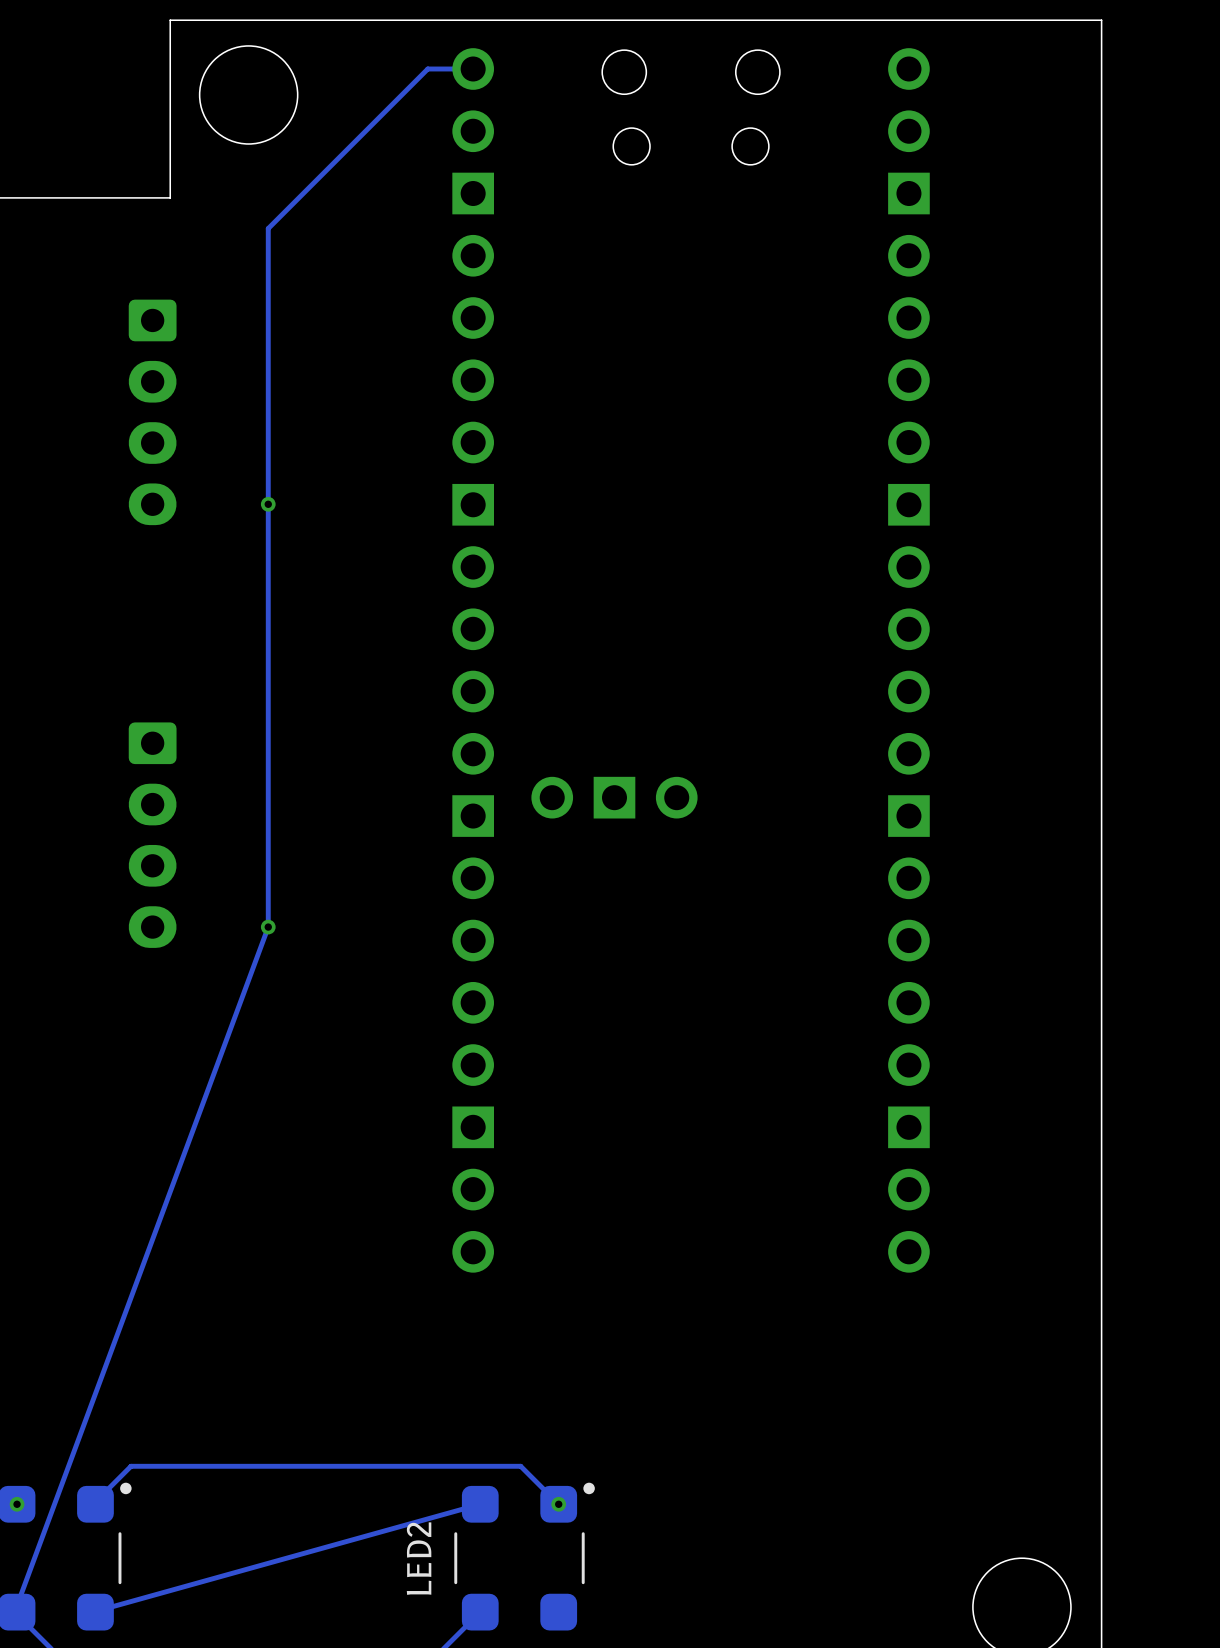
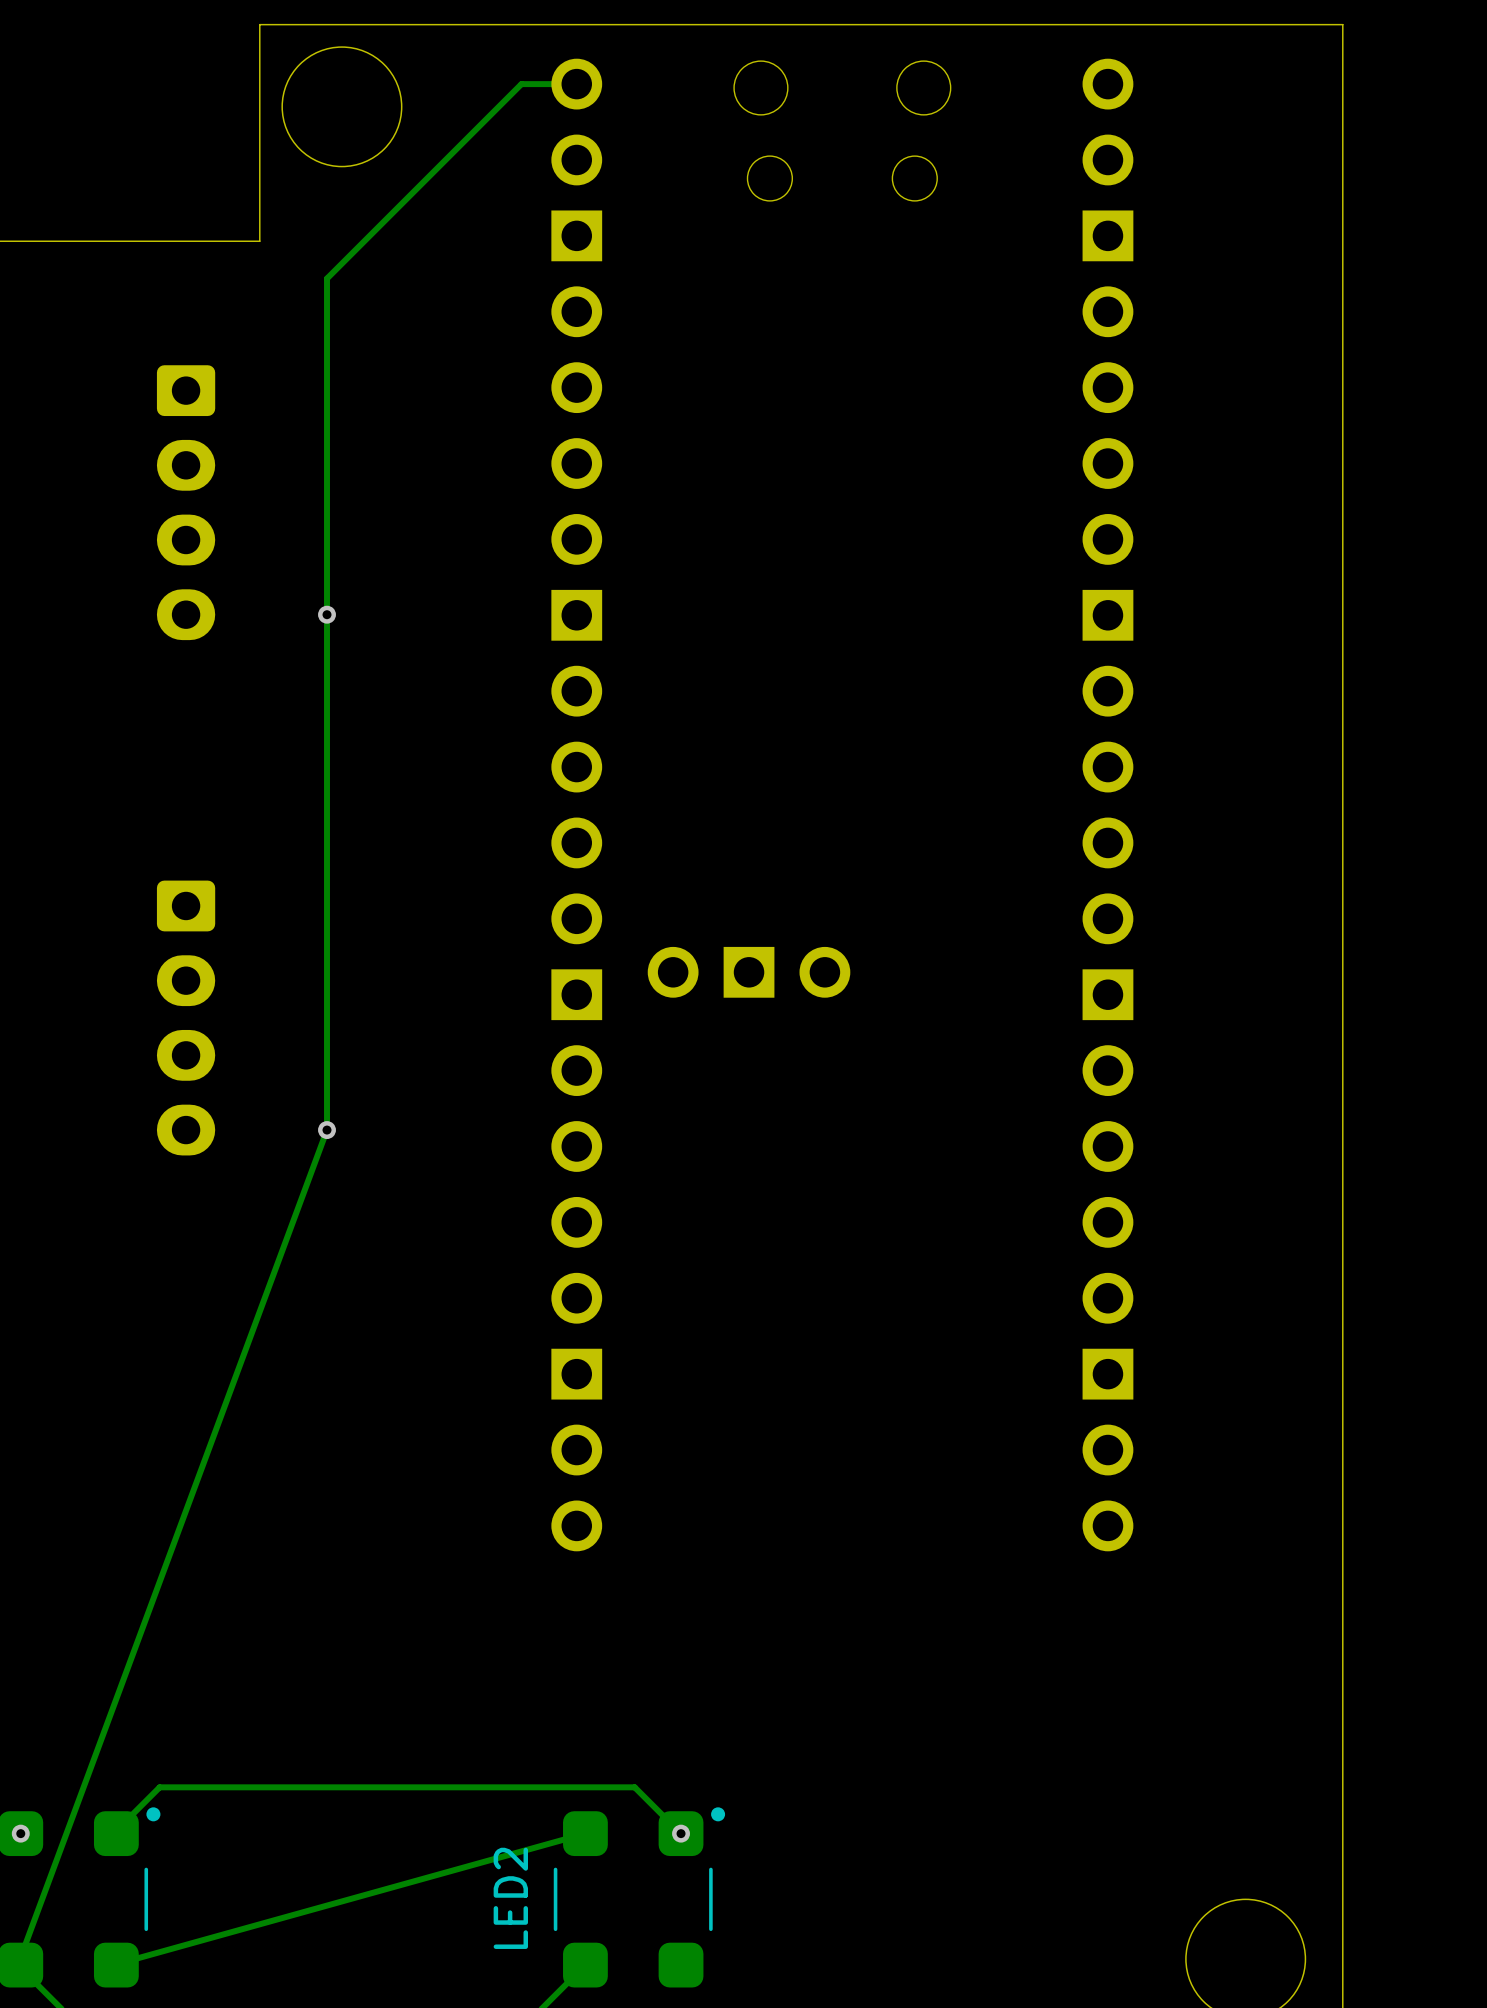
board edge: (213, 20) (170, 20) (170, 197) -> (259, 24) (259, 241) (207, 241)
round board edge position: (248, 94) -> (341, 106)

